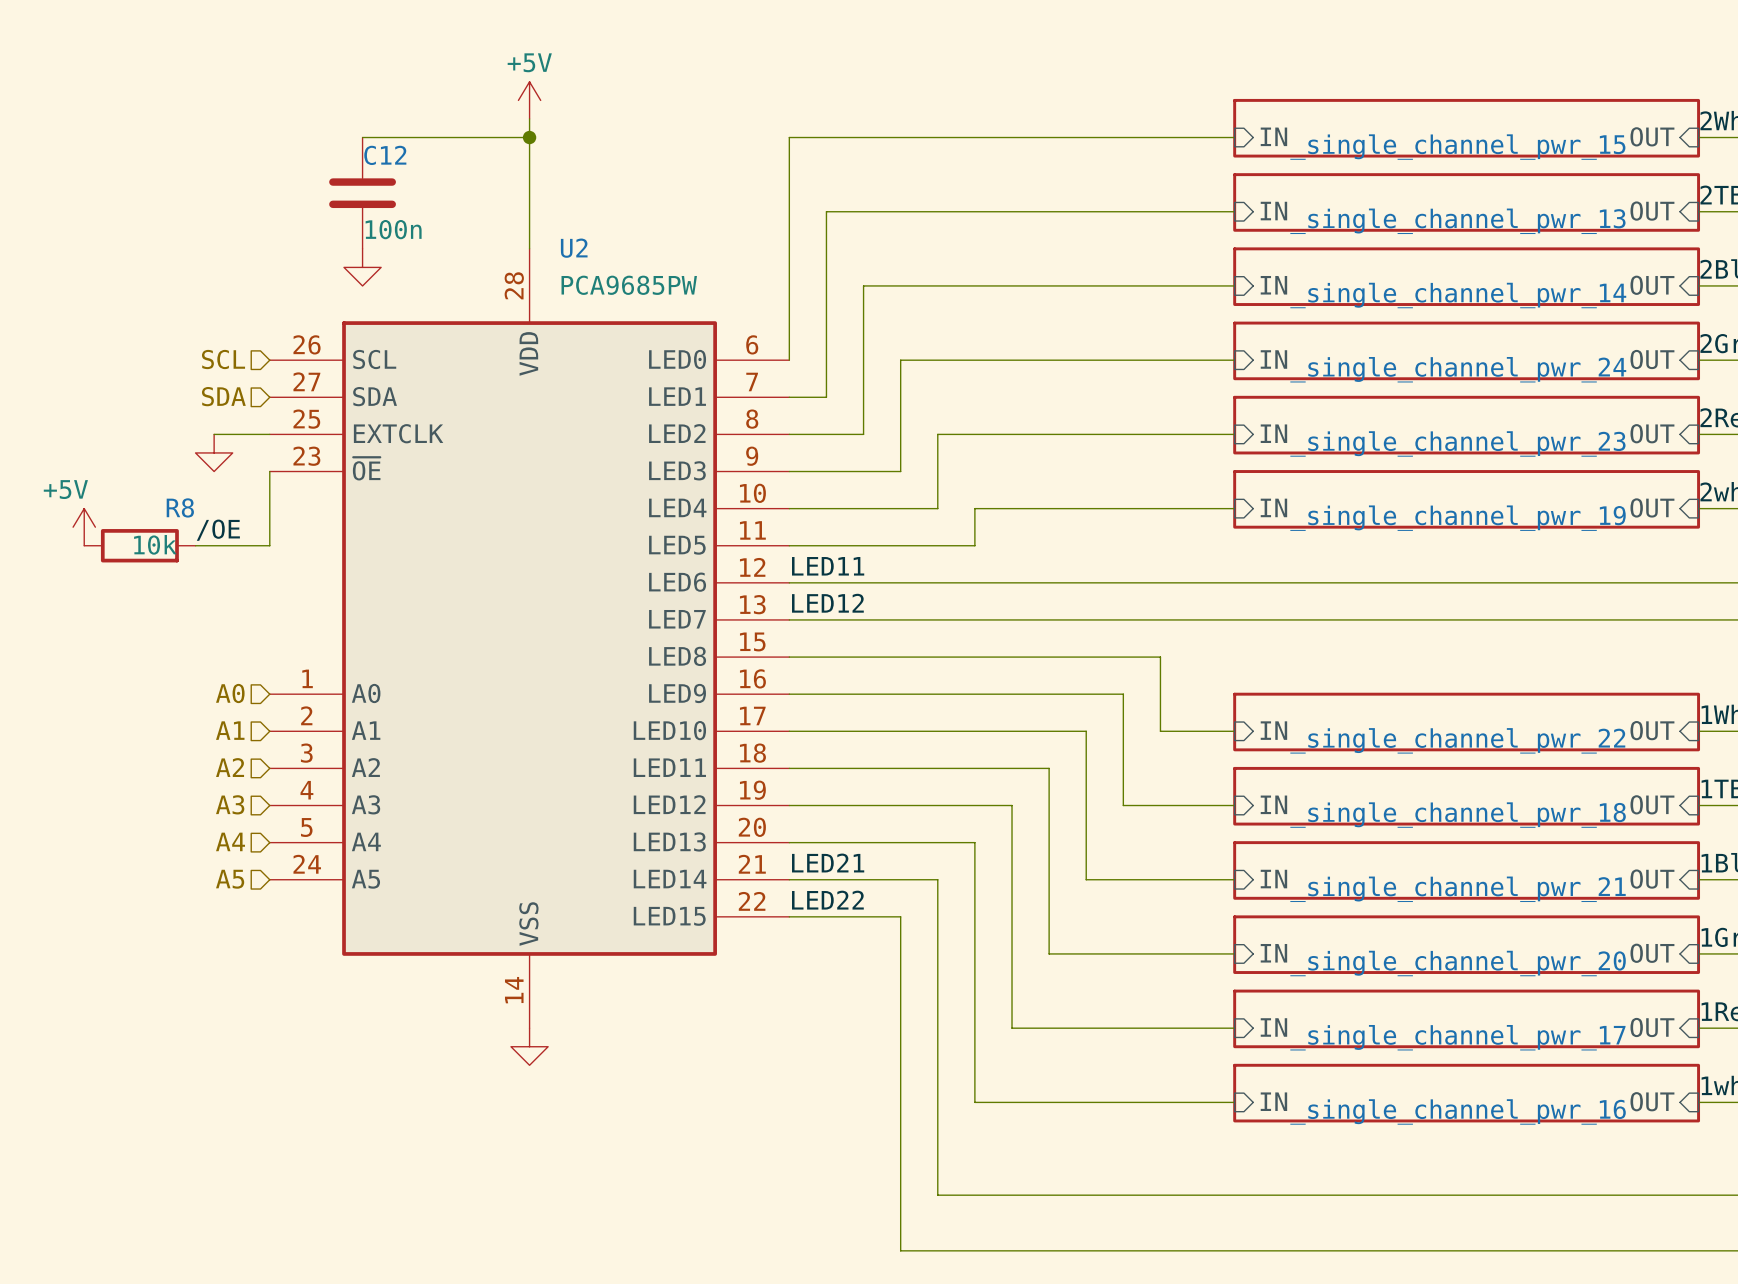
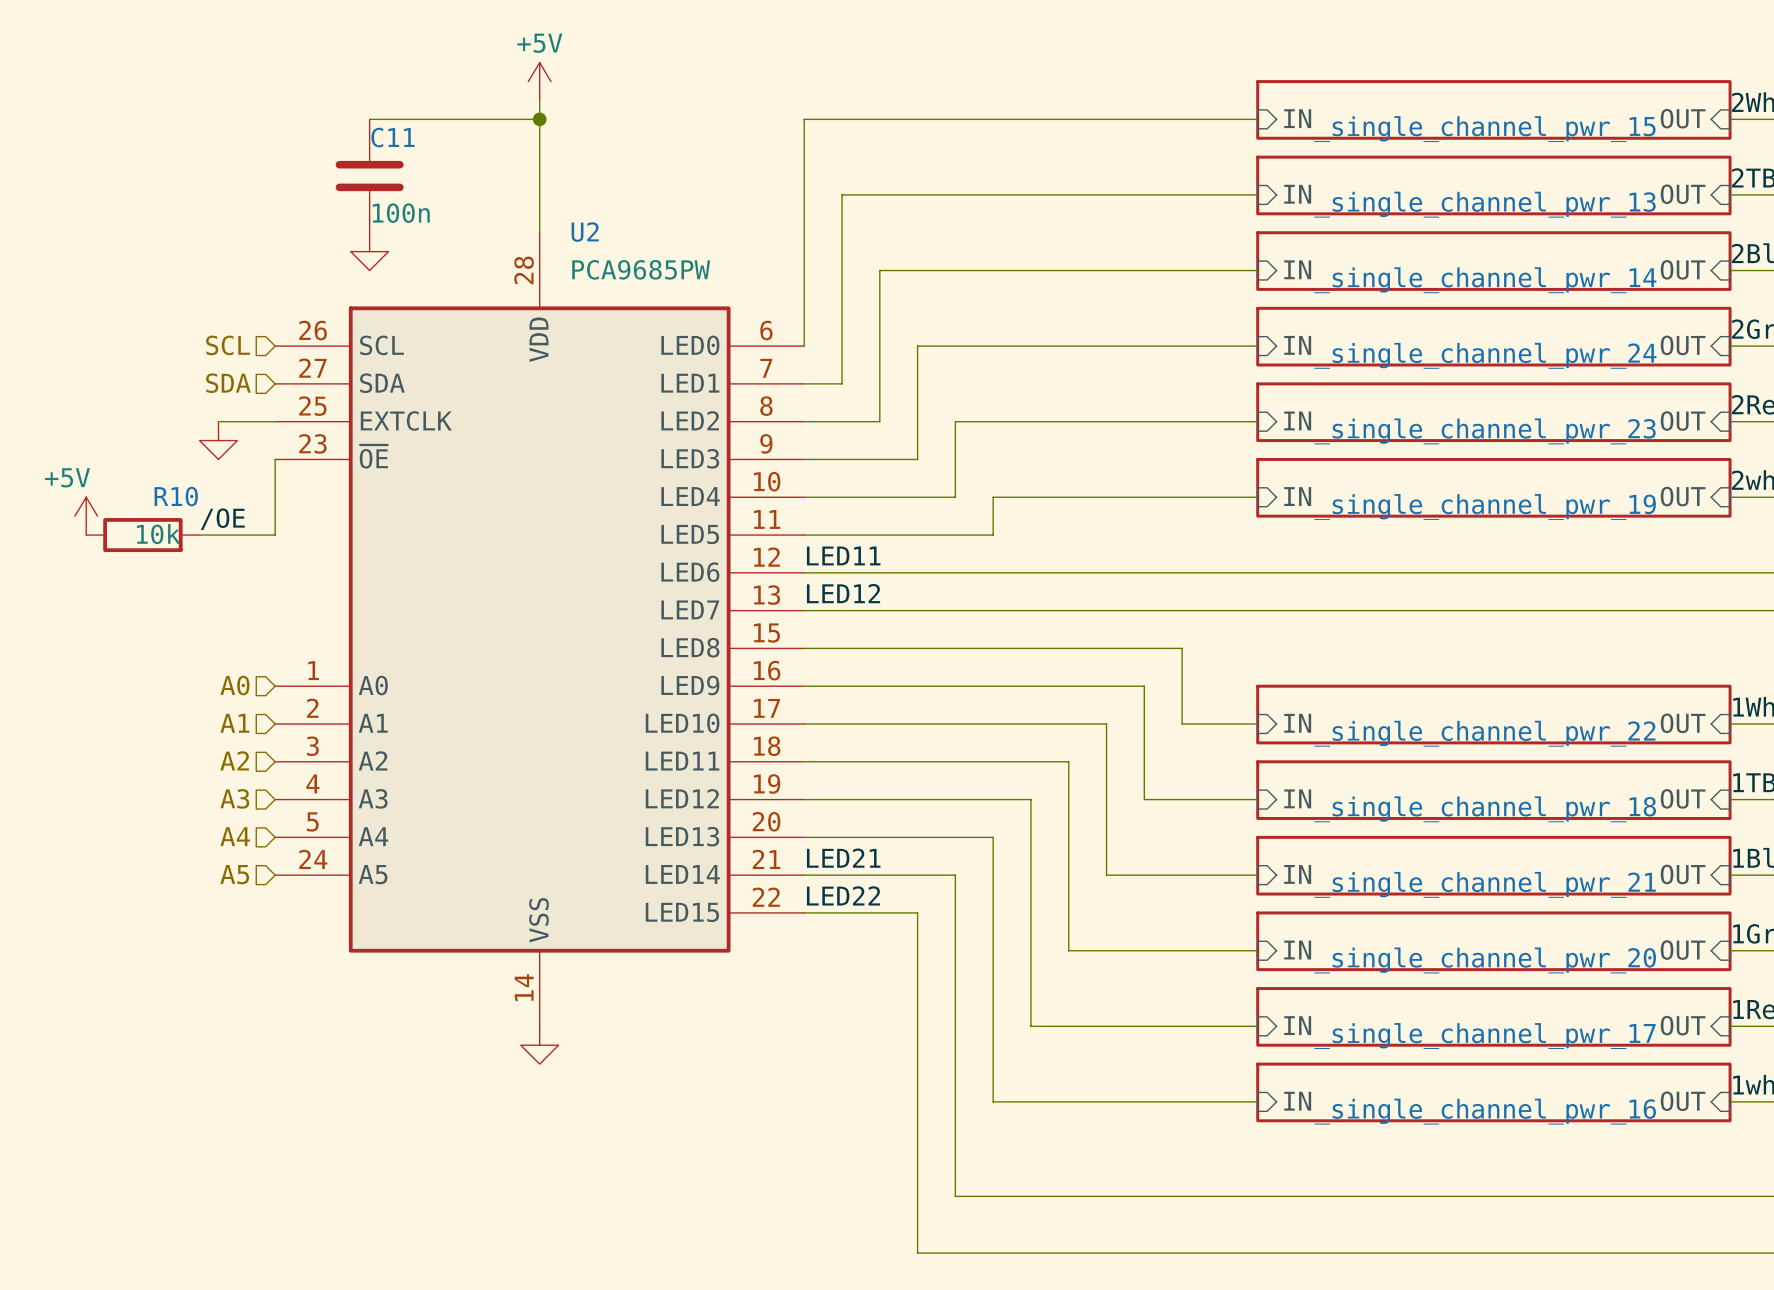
C12 name: C12 (385, 155) -> C11 (393, 137)
R8 name: R8 (180, 507) -> R10 (176, 496)

